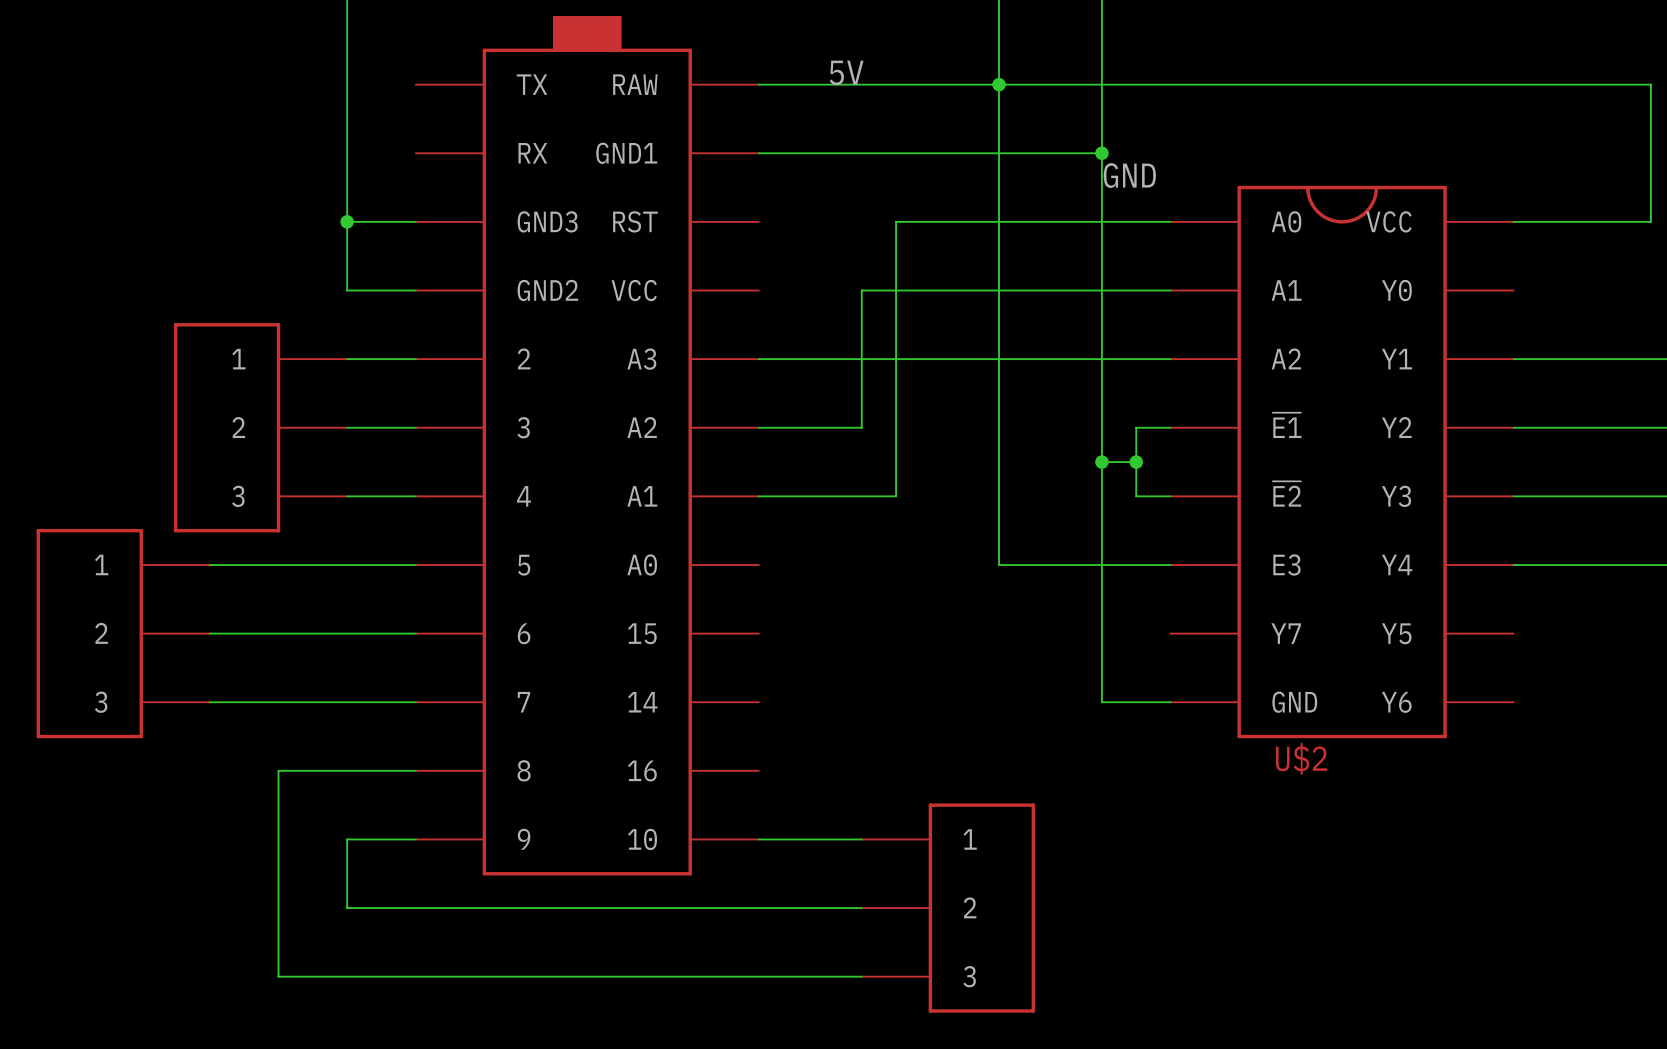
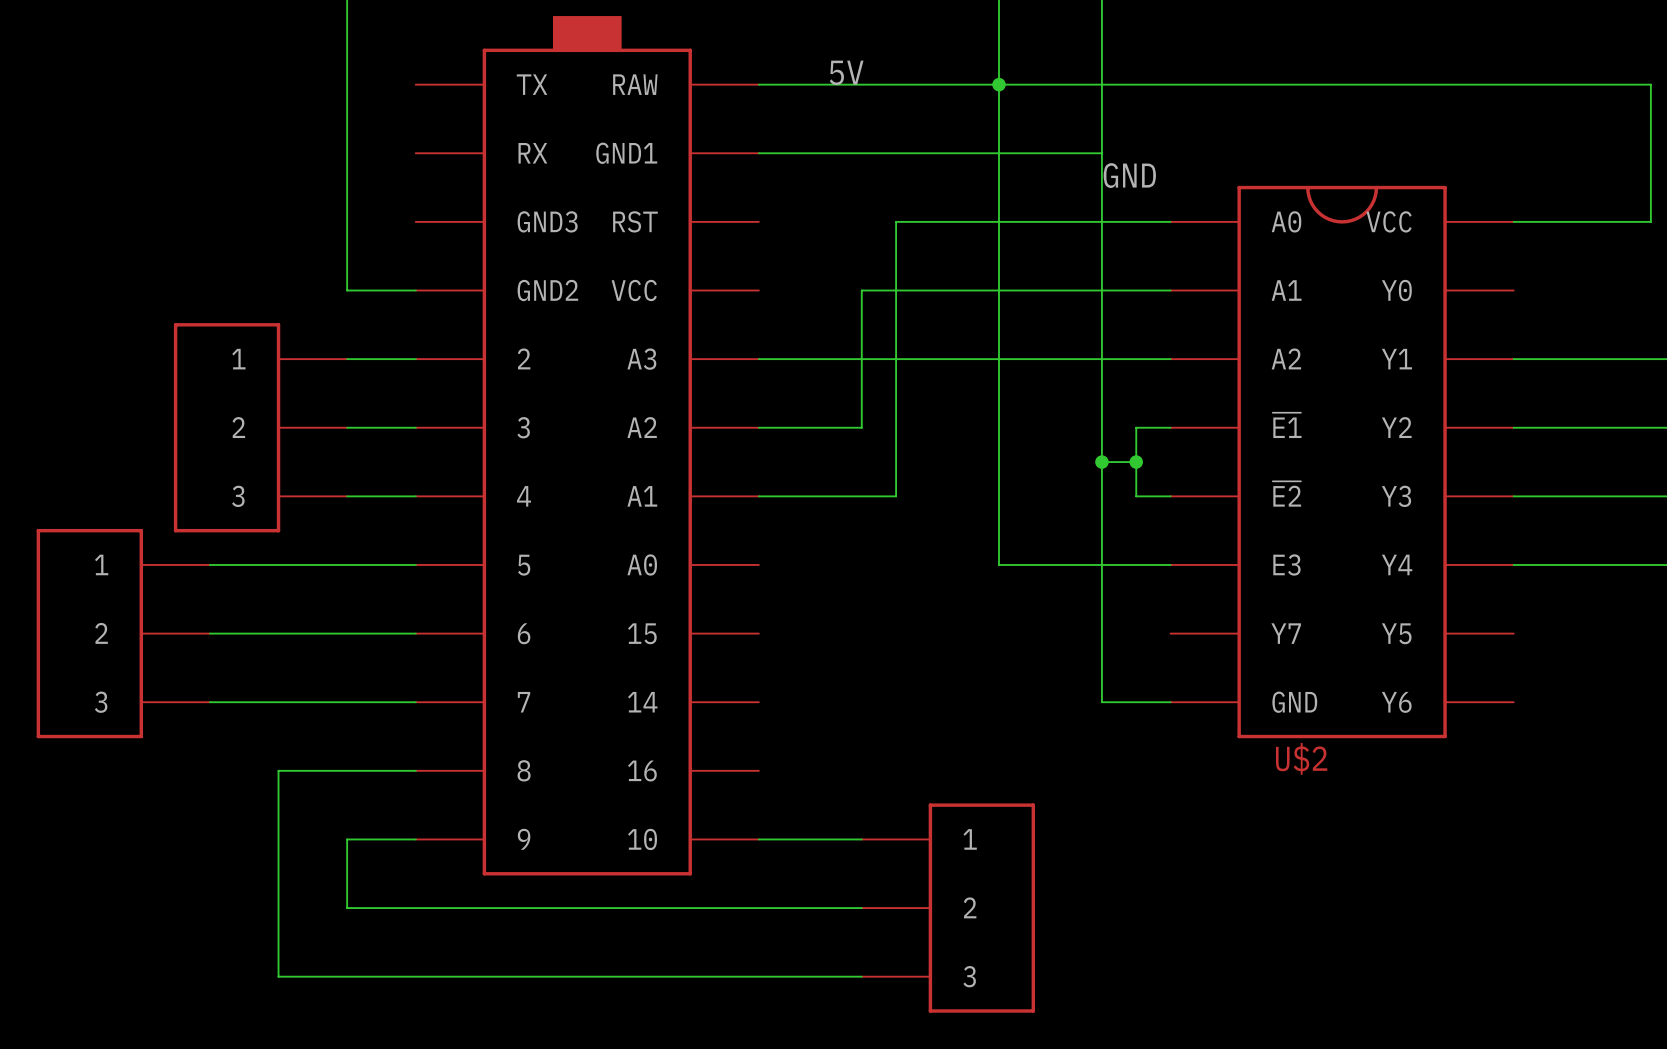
junction: (1101, 153) -> none
wire: (347, 221) (415, 221) -> none
junction: (347, 221) -> none

